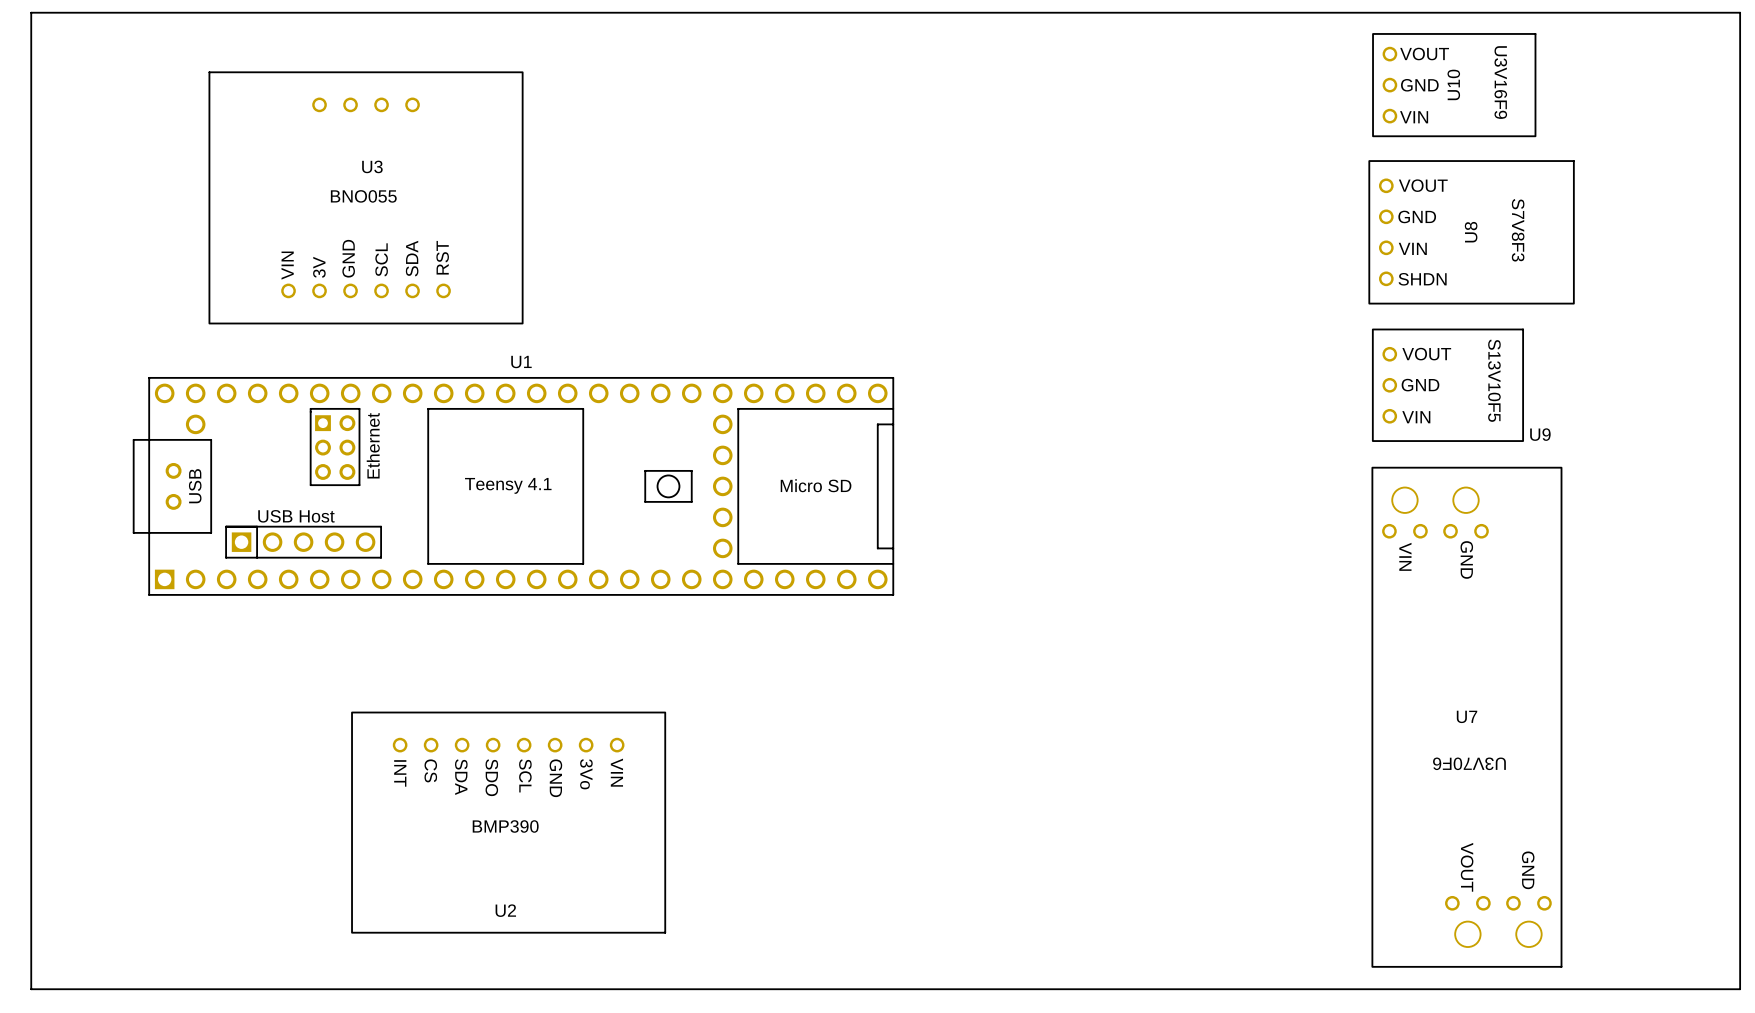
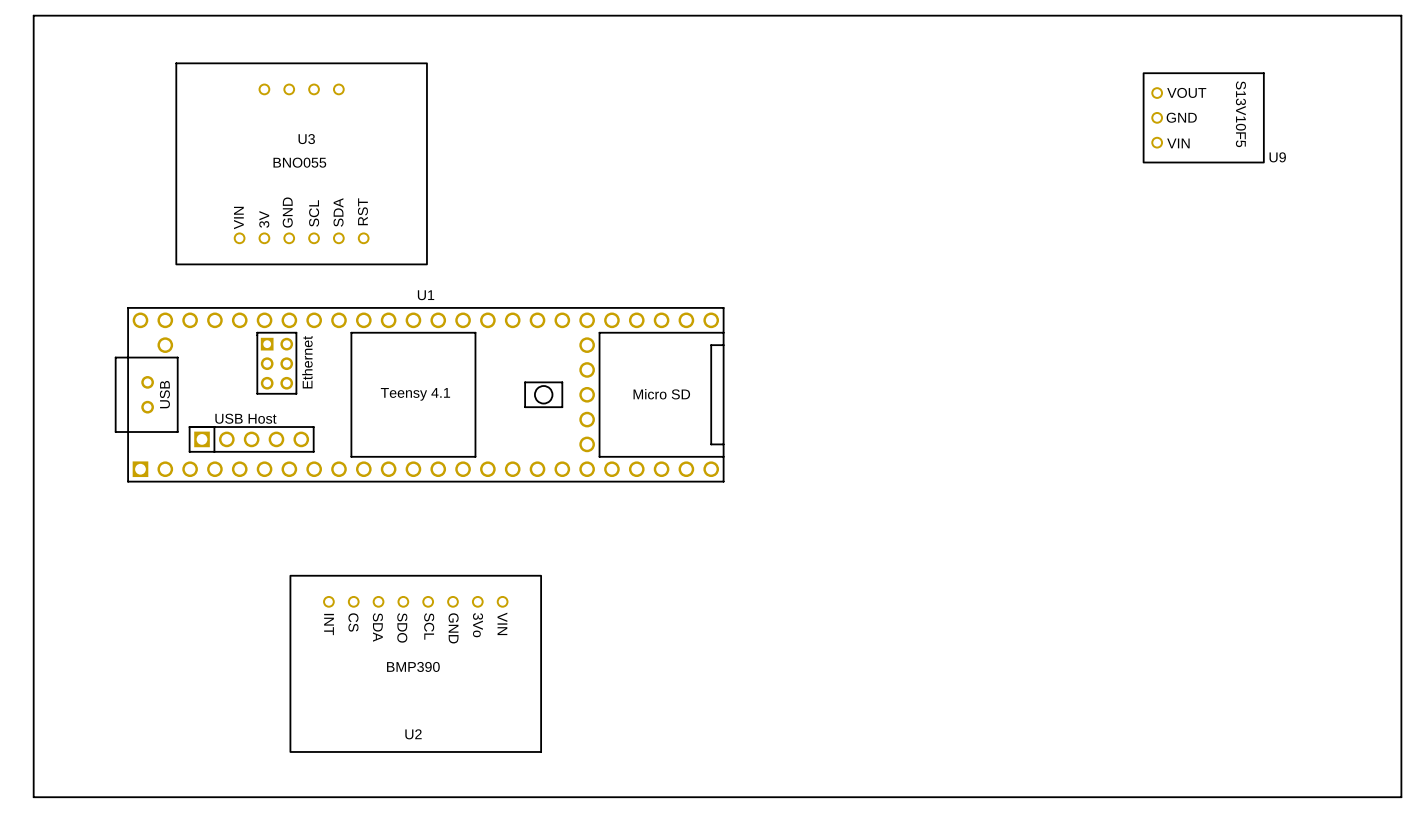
U10: (1454, 85) -> none
U8: (1471, 232) -> none
U9 position: (1447, 385) -> (1203, 117)
U7: (1466, 717) -> none

